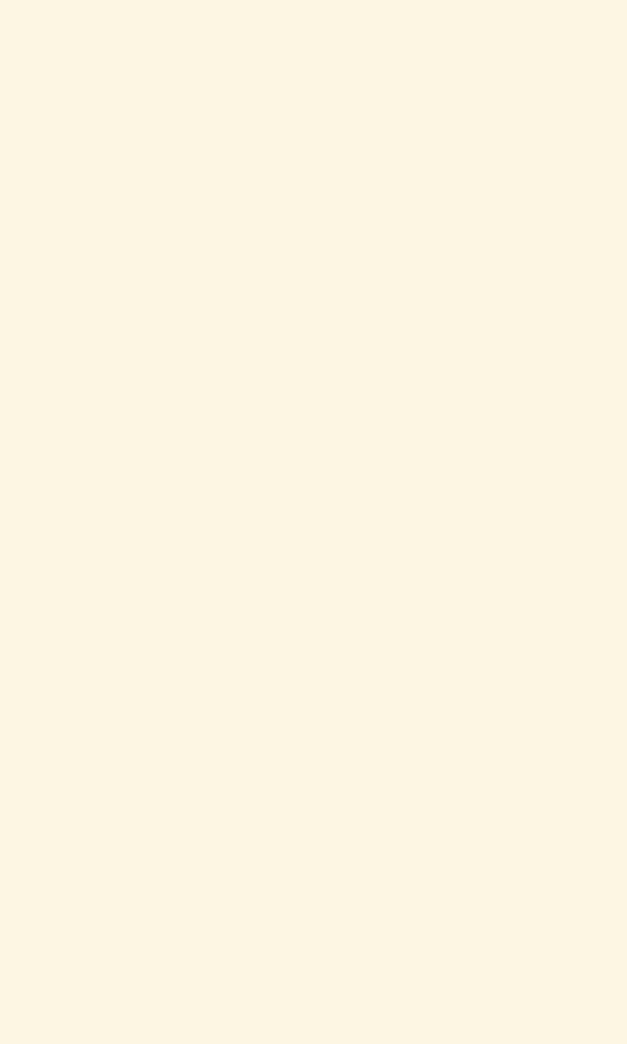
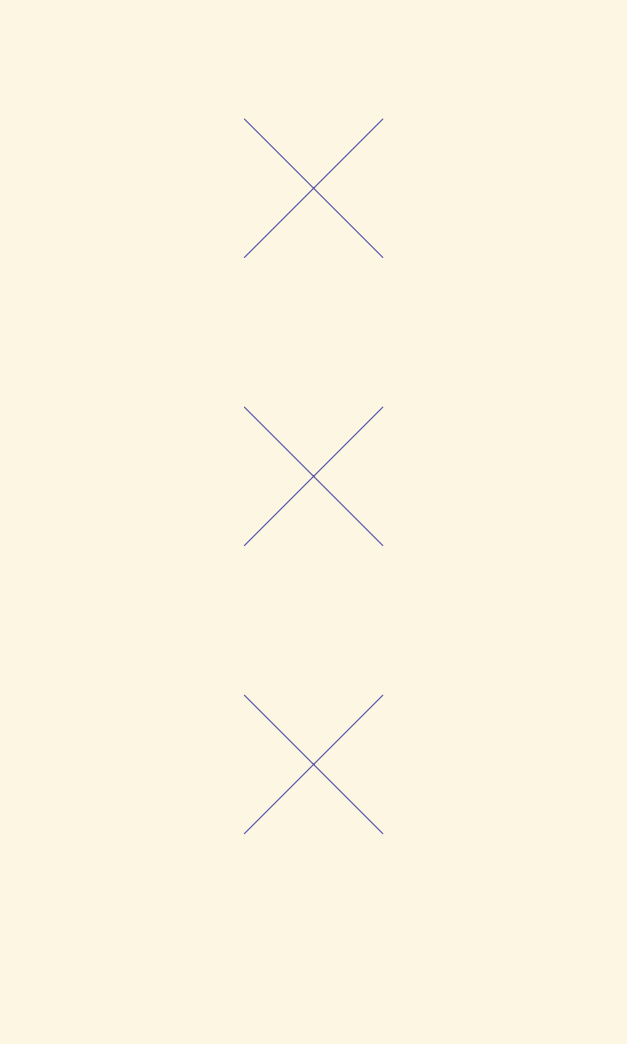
no-connect mark: none -> (313, 188)
no-connect mark: none -> (313, 476)
no-connect mark: none -> (313, 764)

